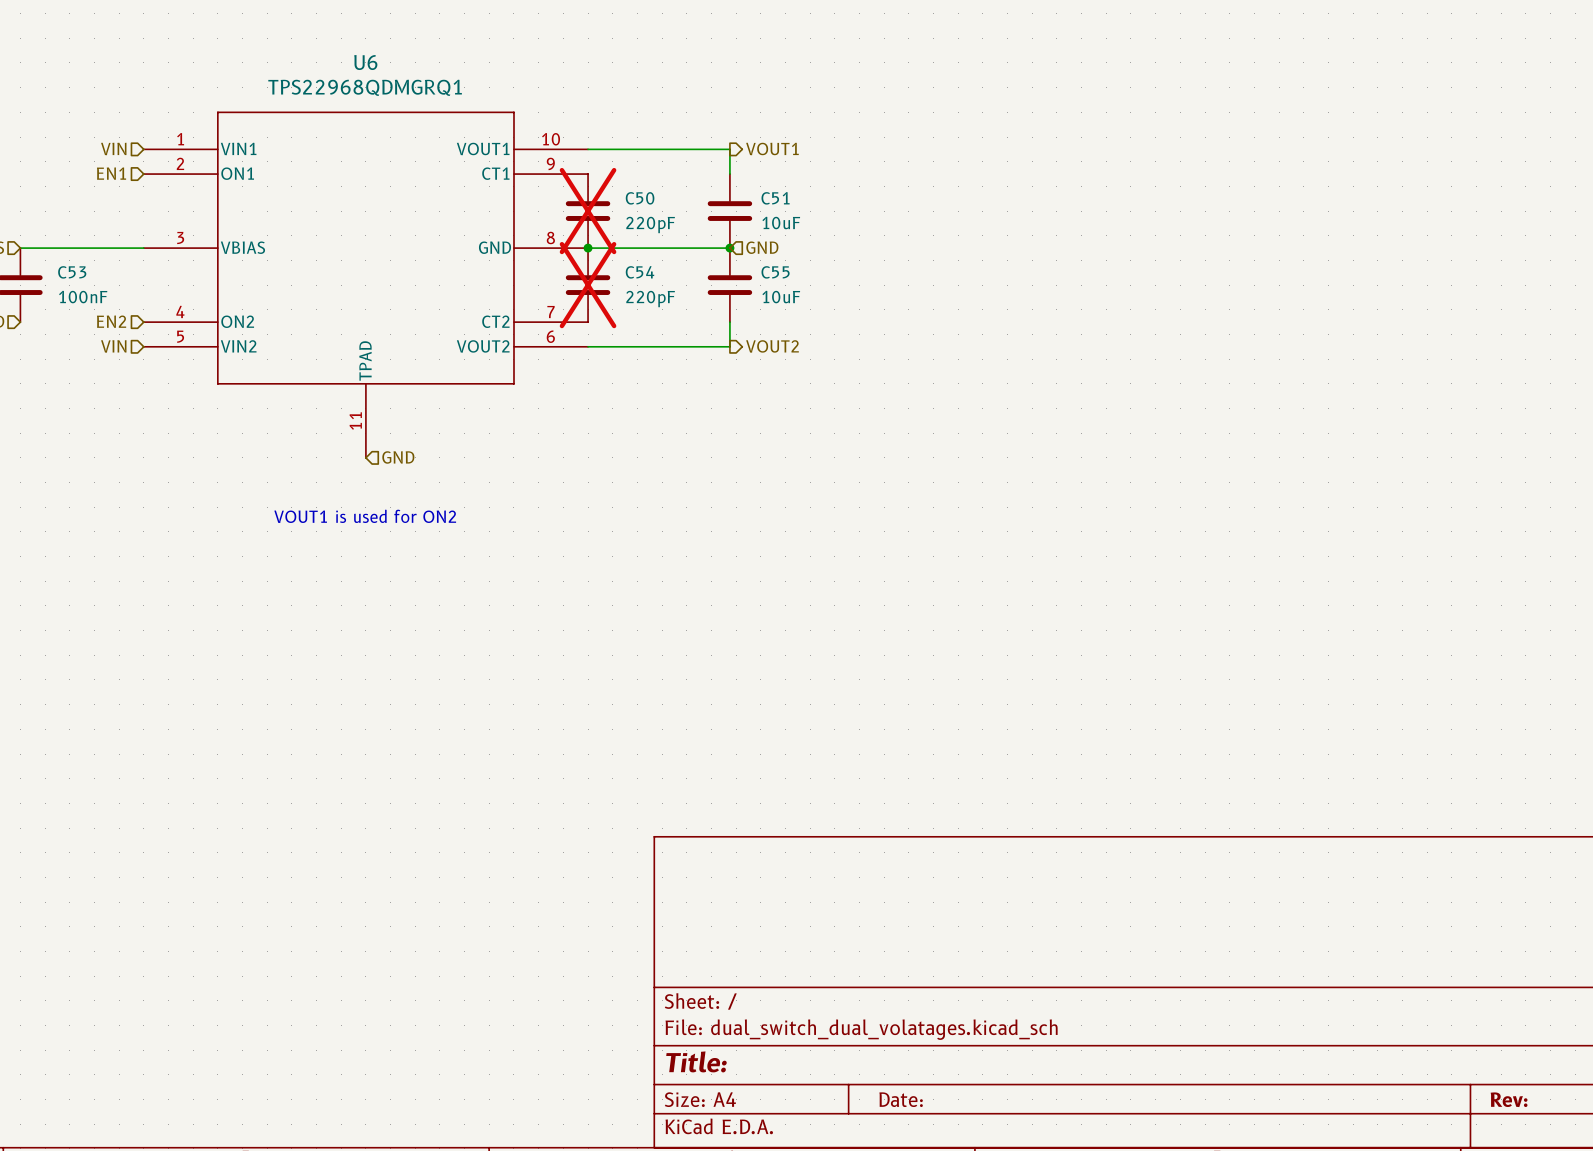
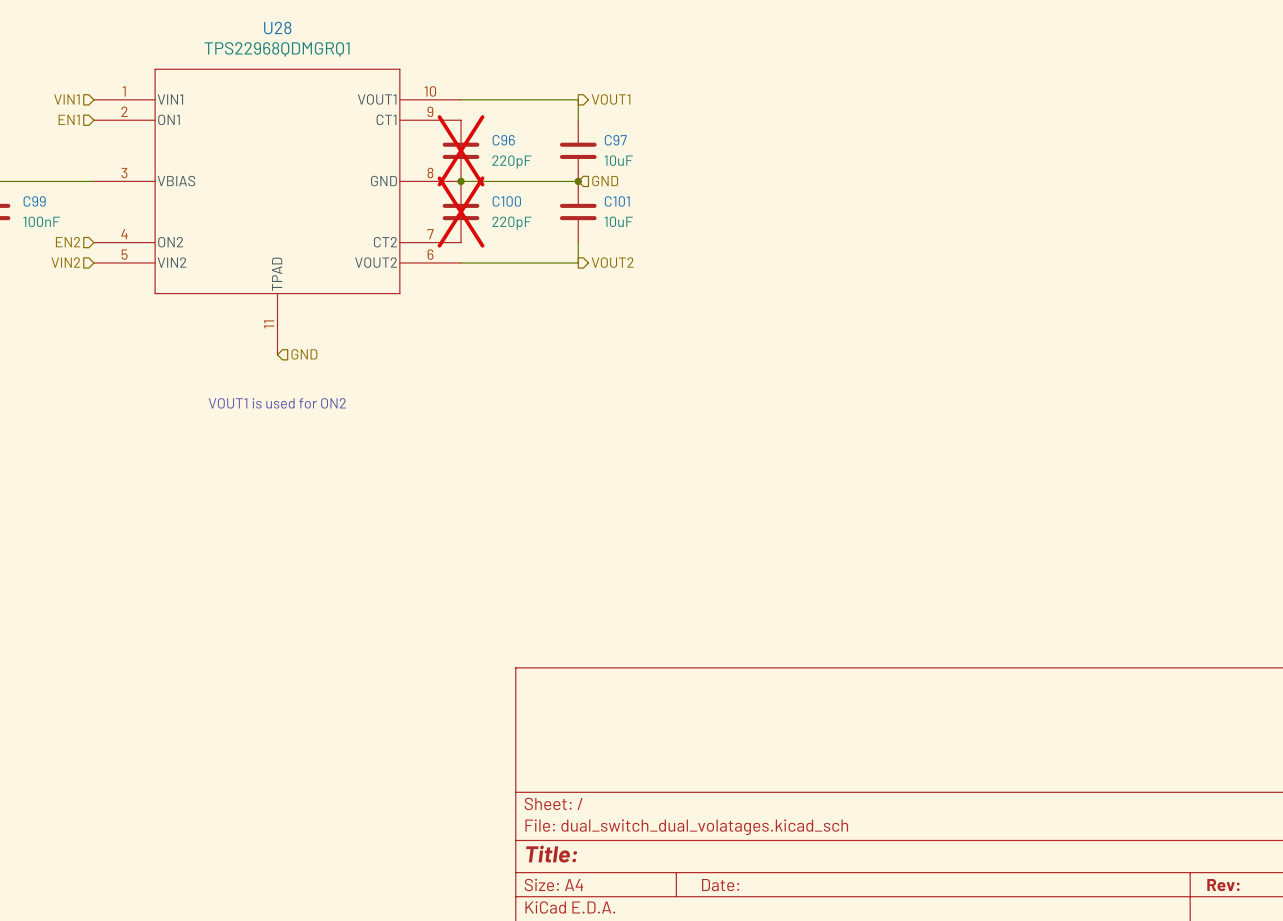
U6 name: U6 (365, 62) -> U28 (277, 27)
hierarchical label: VIN (113, 148) -> VIN1 (66, 99)
C50 name: C50 (640, 198) -> C96 (503, 140)
C51 name: C51 (775, 198) -> C97 (615, 140)
C53 name: C53 (72, 272) -> C99 (34, 201)
C54 name: C54 (640, 272) -> C100 (506, 201)
C55 name: C55 (775, 272) -> C101 (617, 201)
hierarchical label: VIN (113, 346) -> VIN2 (65, 262)

